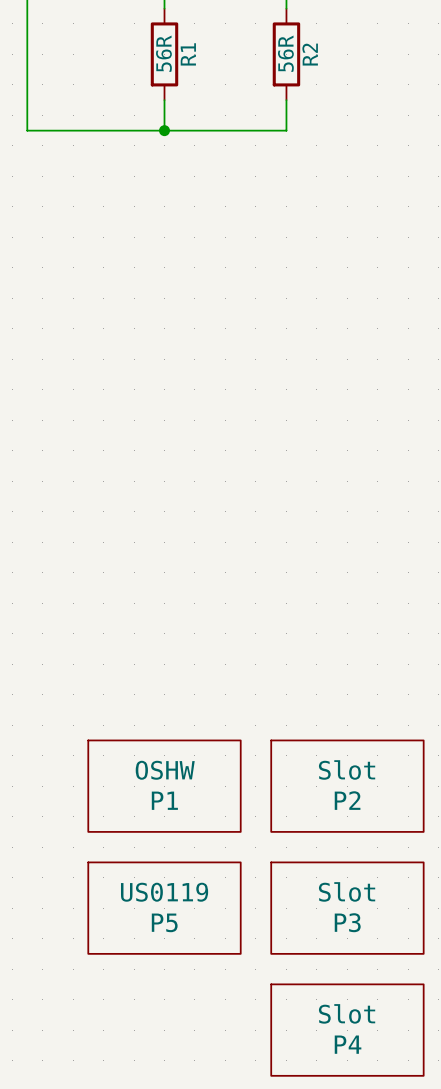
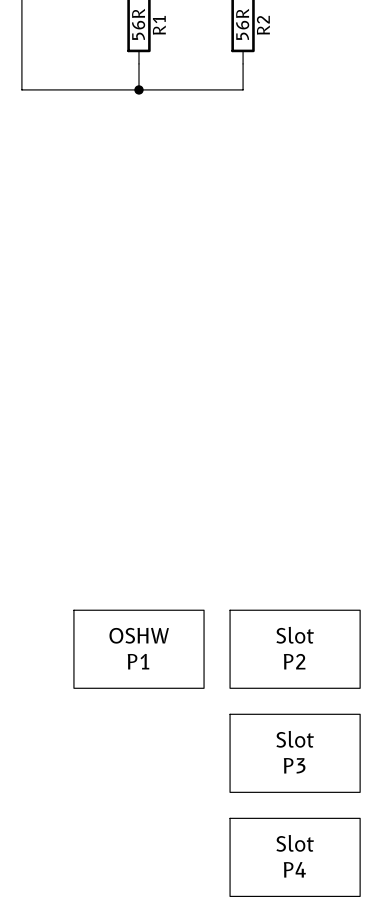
P5: US0119 (164, 908) -> none

